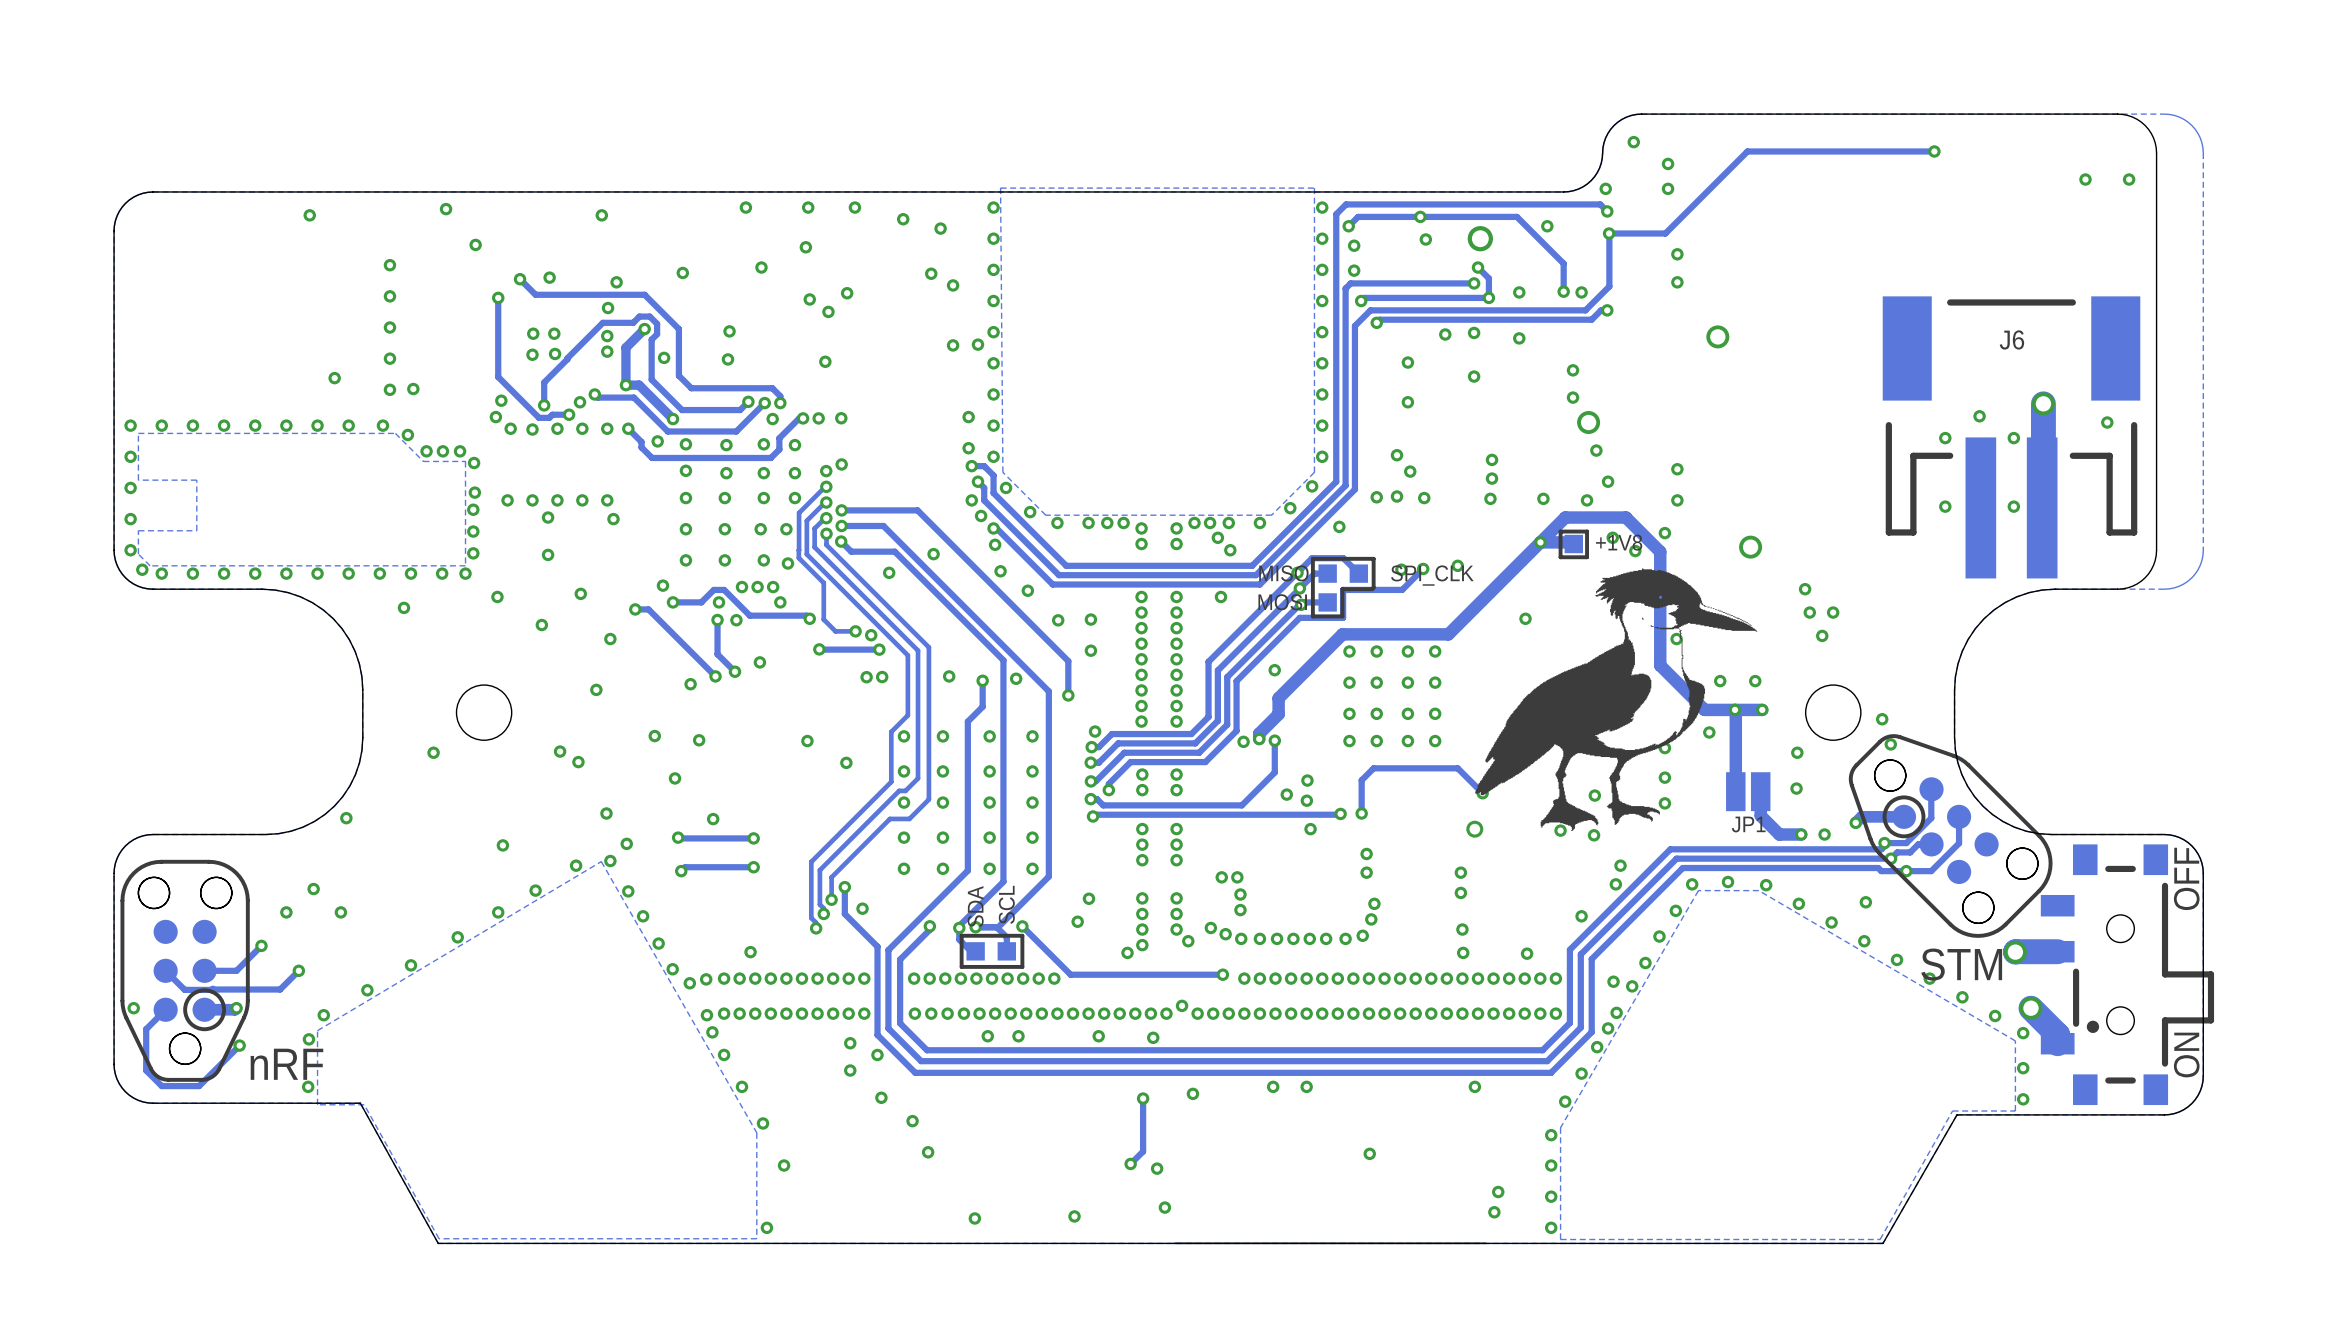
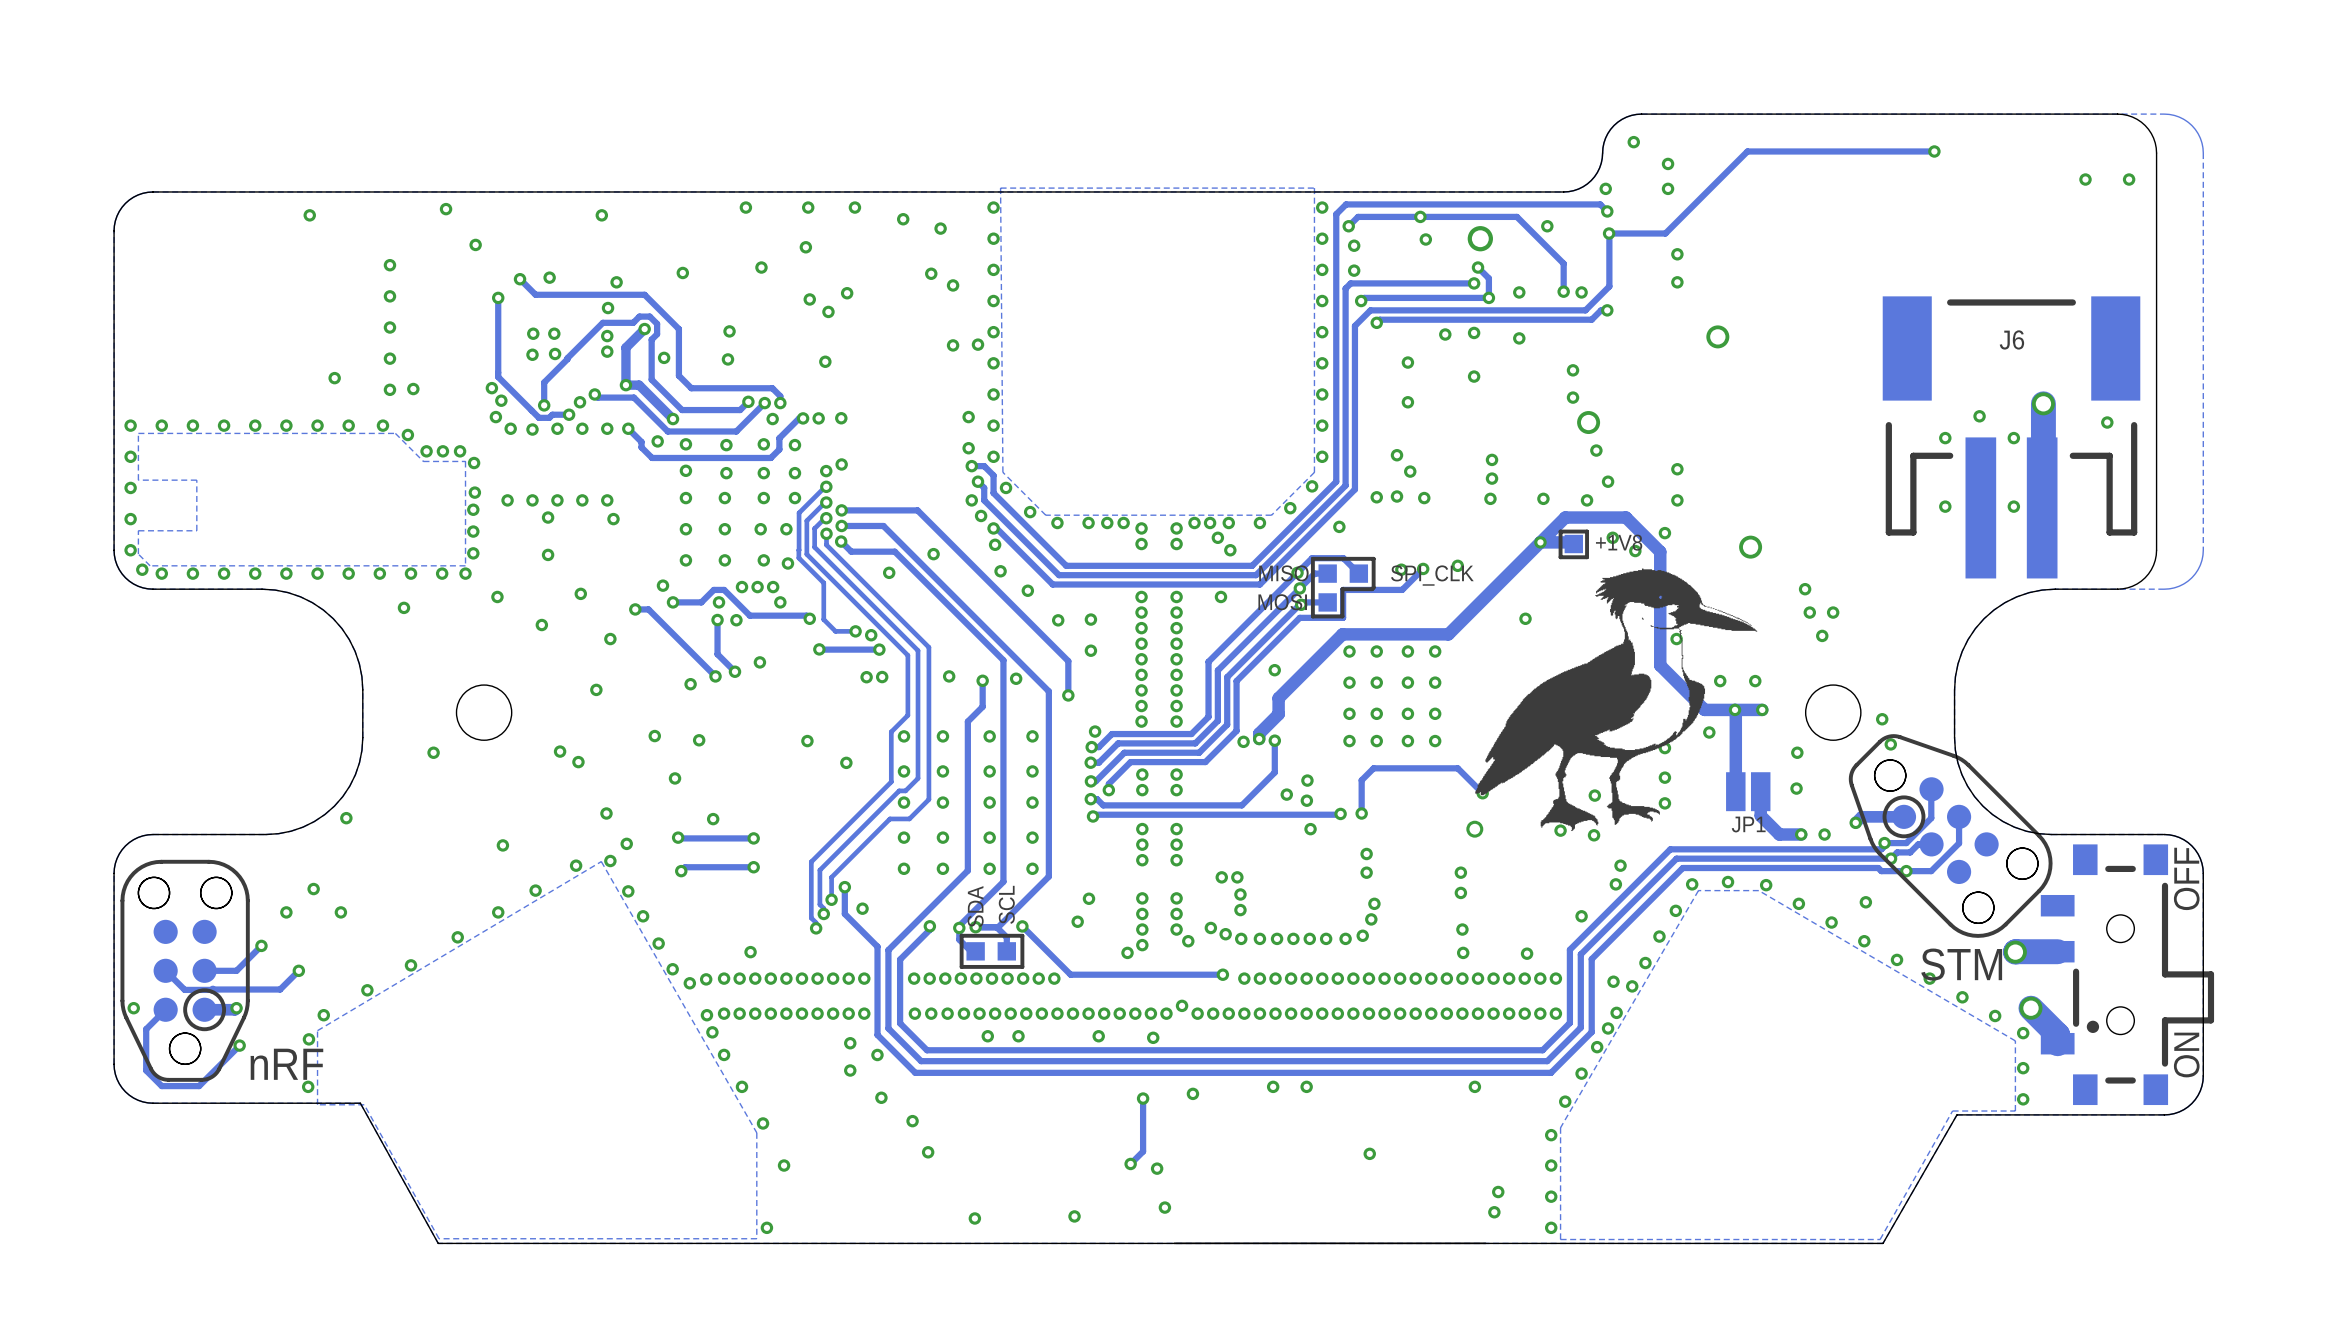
via: none -> (491, 388)

